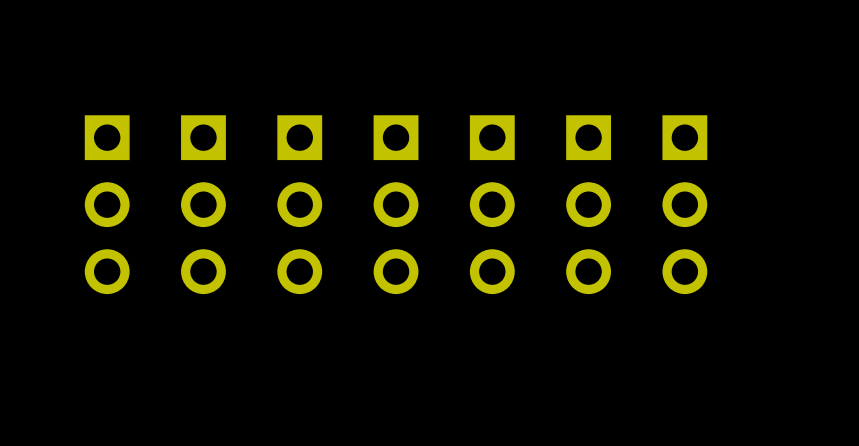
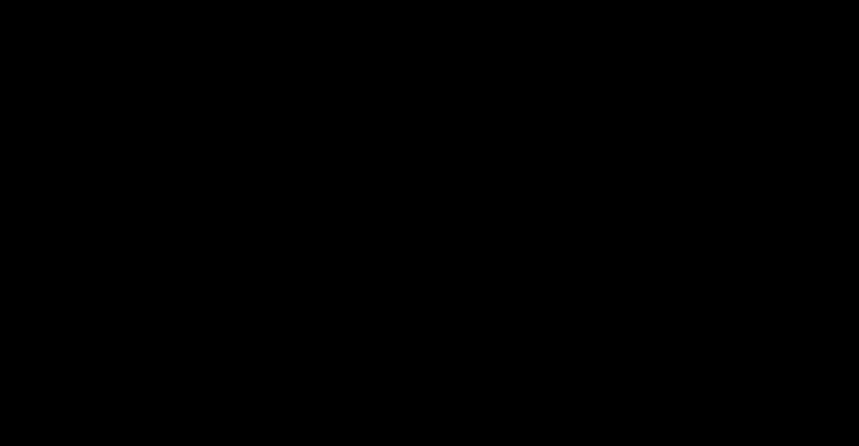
part: (107, 204) -> none
part: (203, 204) -> none
part: (299, 204) -> none
part: (396, 204) -> none
part: (492, 204) -> none
part: (588, 204) -> none
part: (684, 204) -> none

